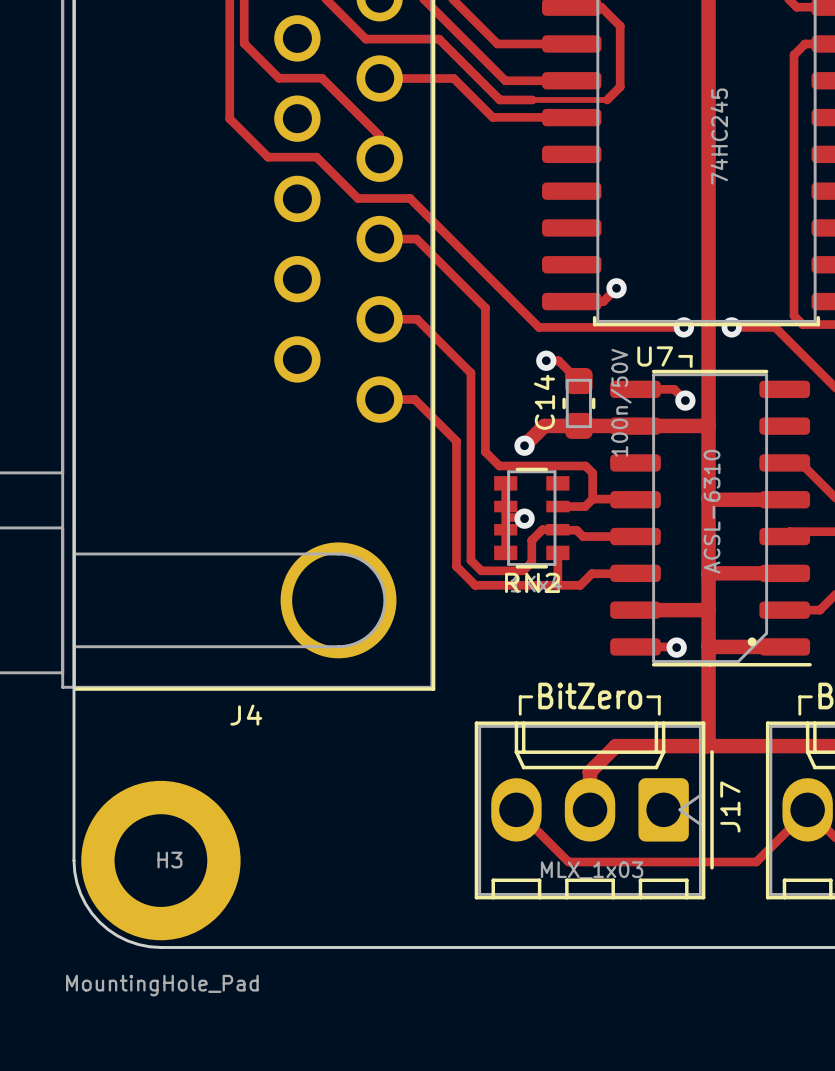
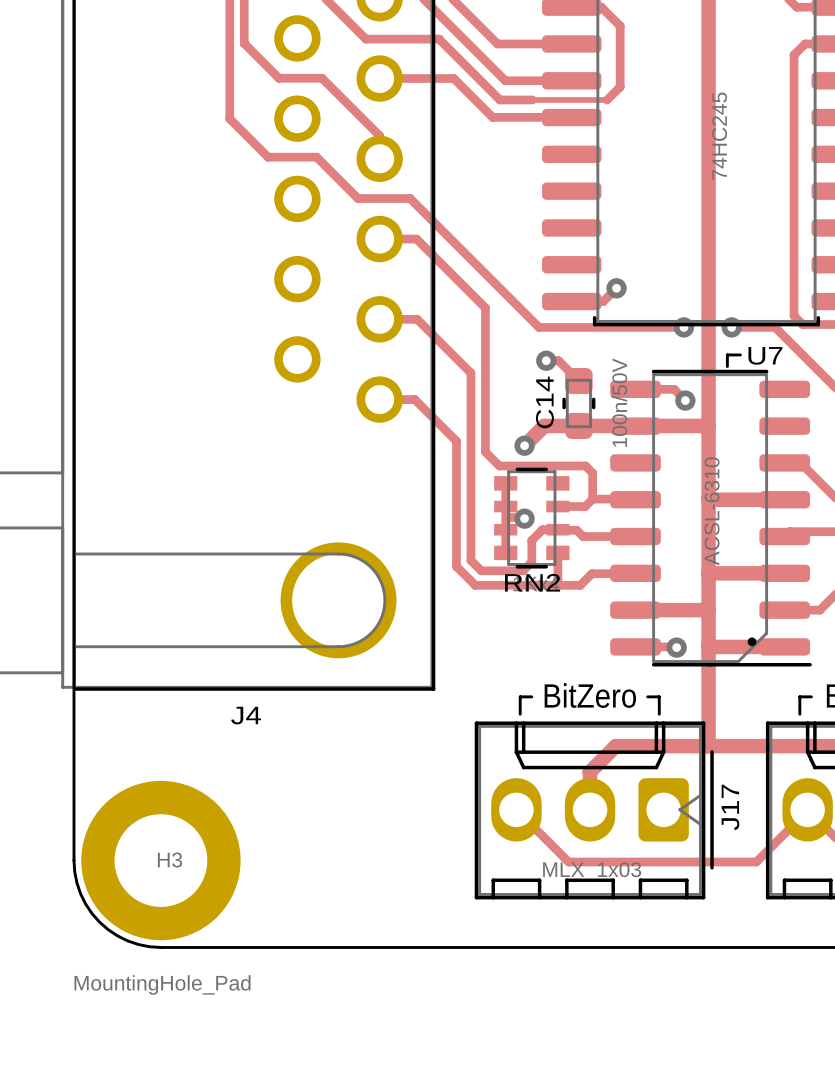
line: none -> (740, 354) (727, 354) (727, 366)
U7 name position: U7 (655, 356) -> U7 (765, 355)
line: (679, 356) (691, 356) (691, 366) -> none

